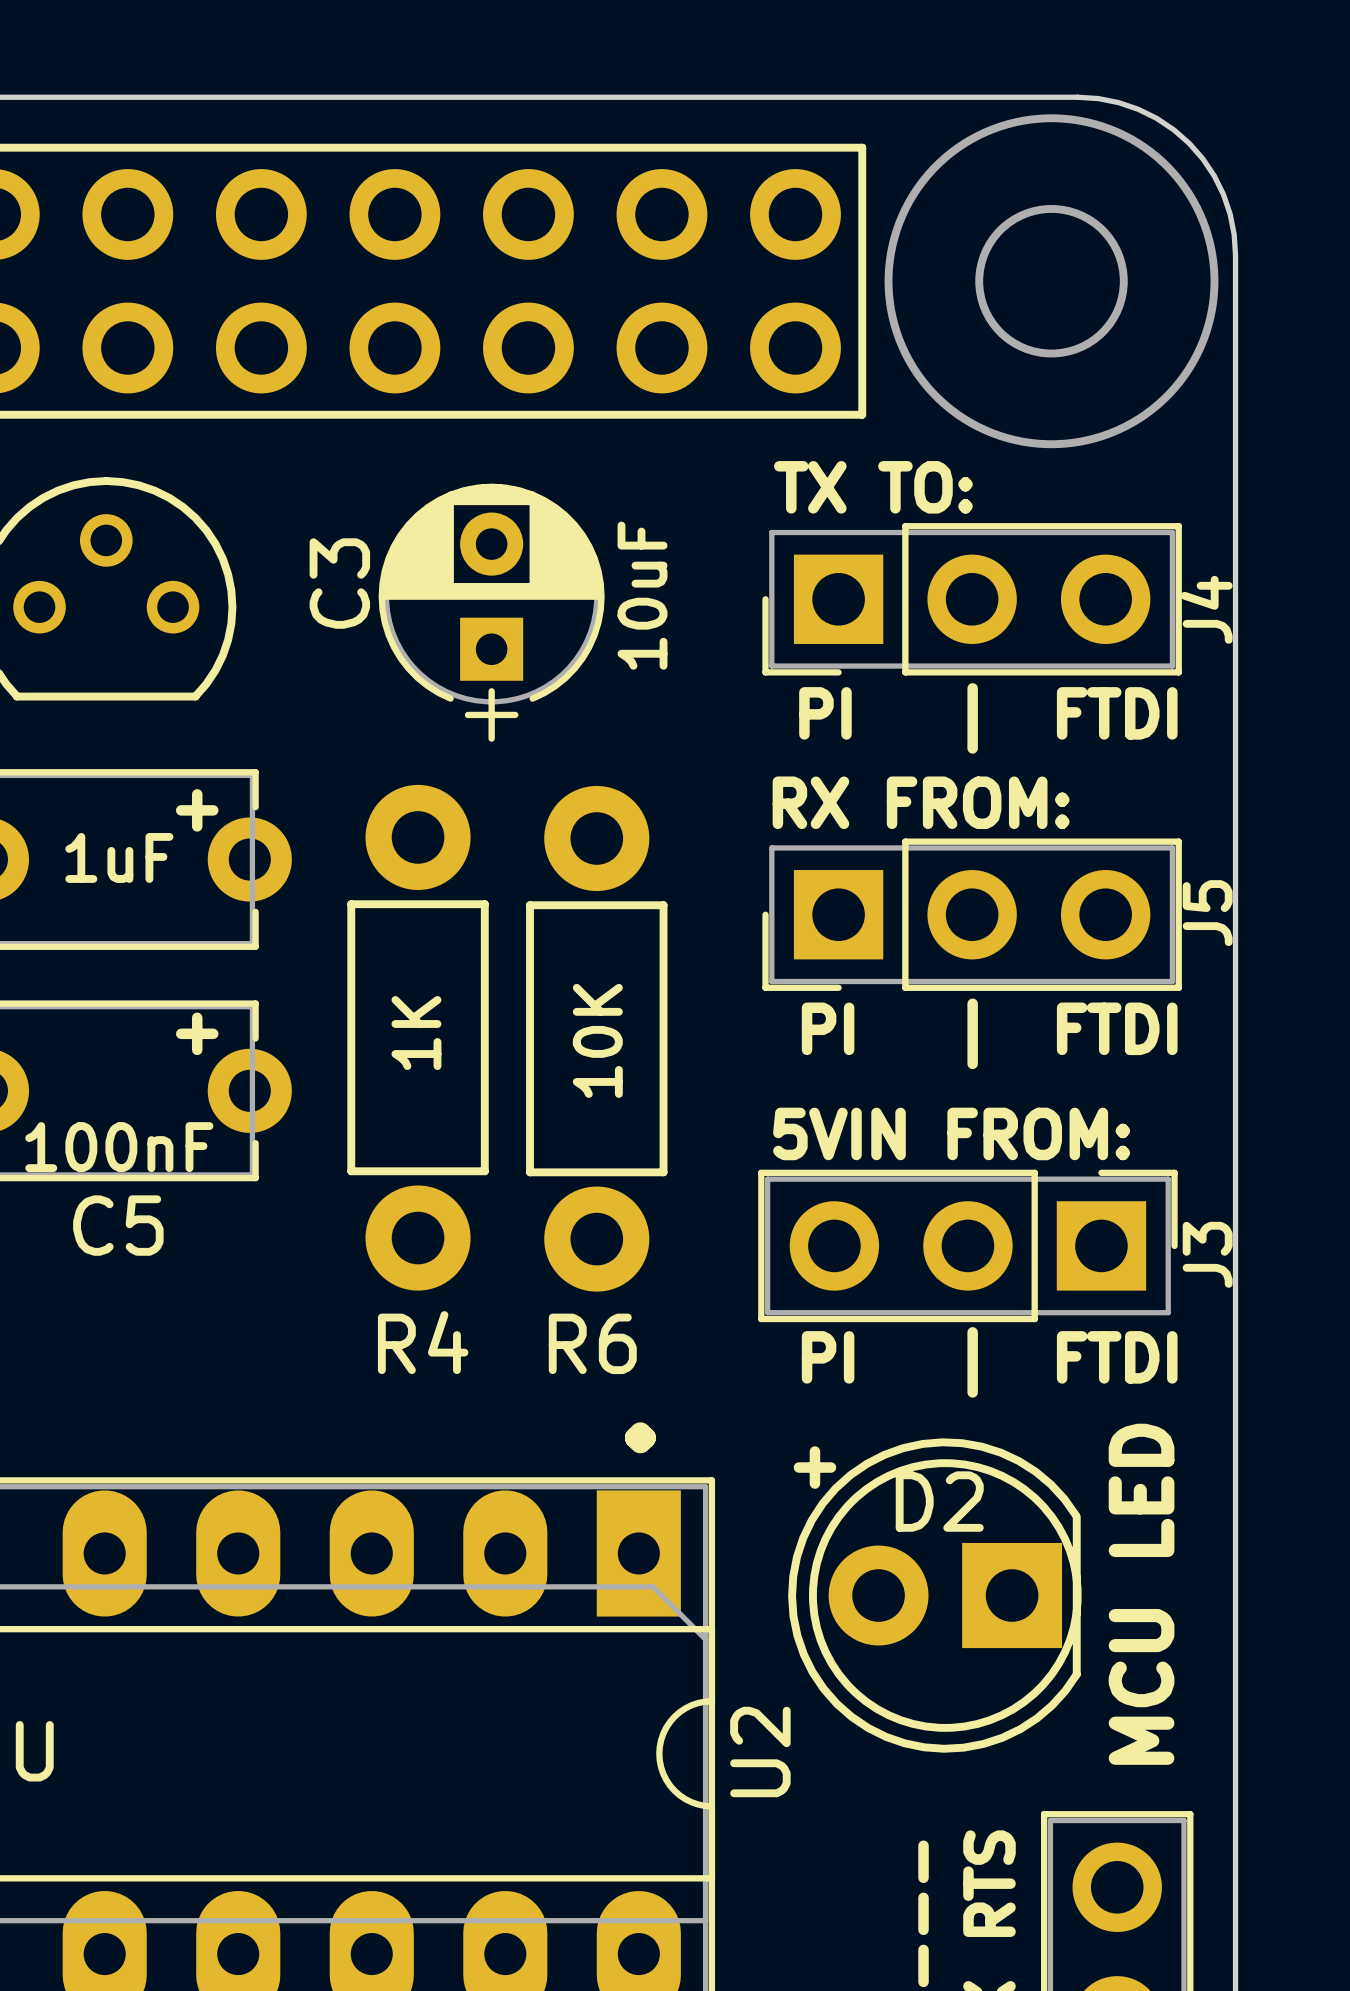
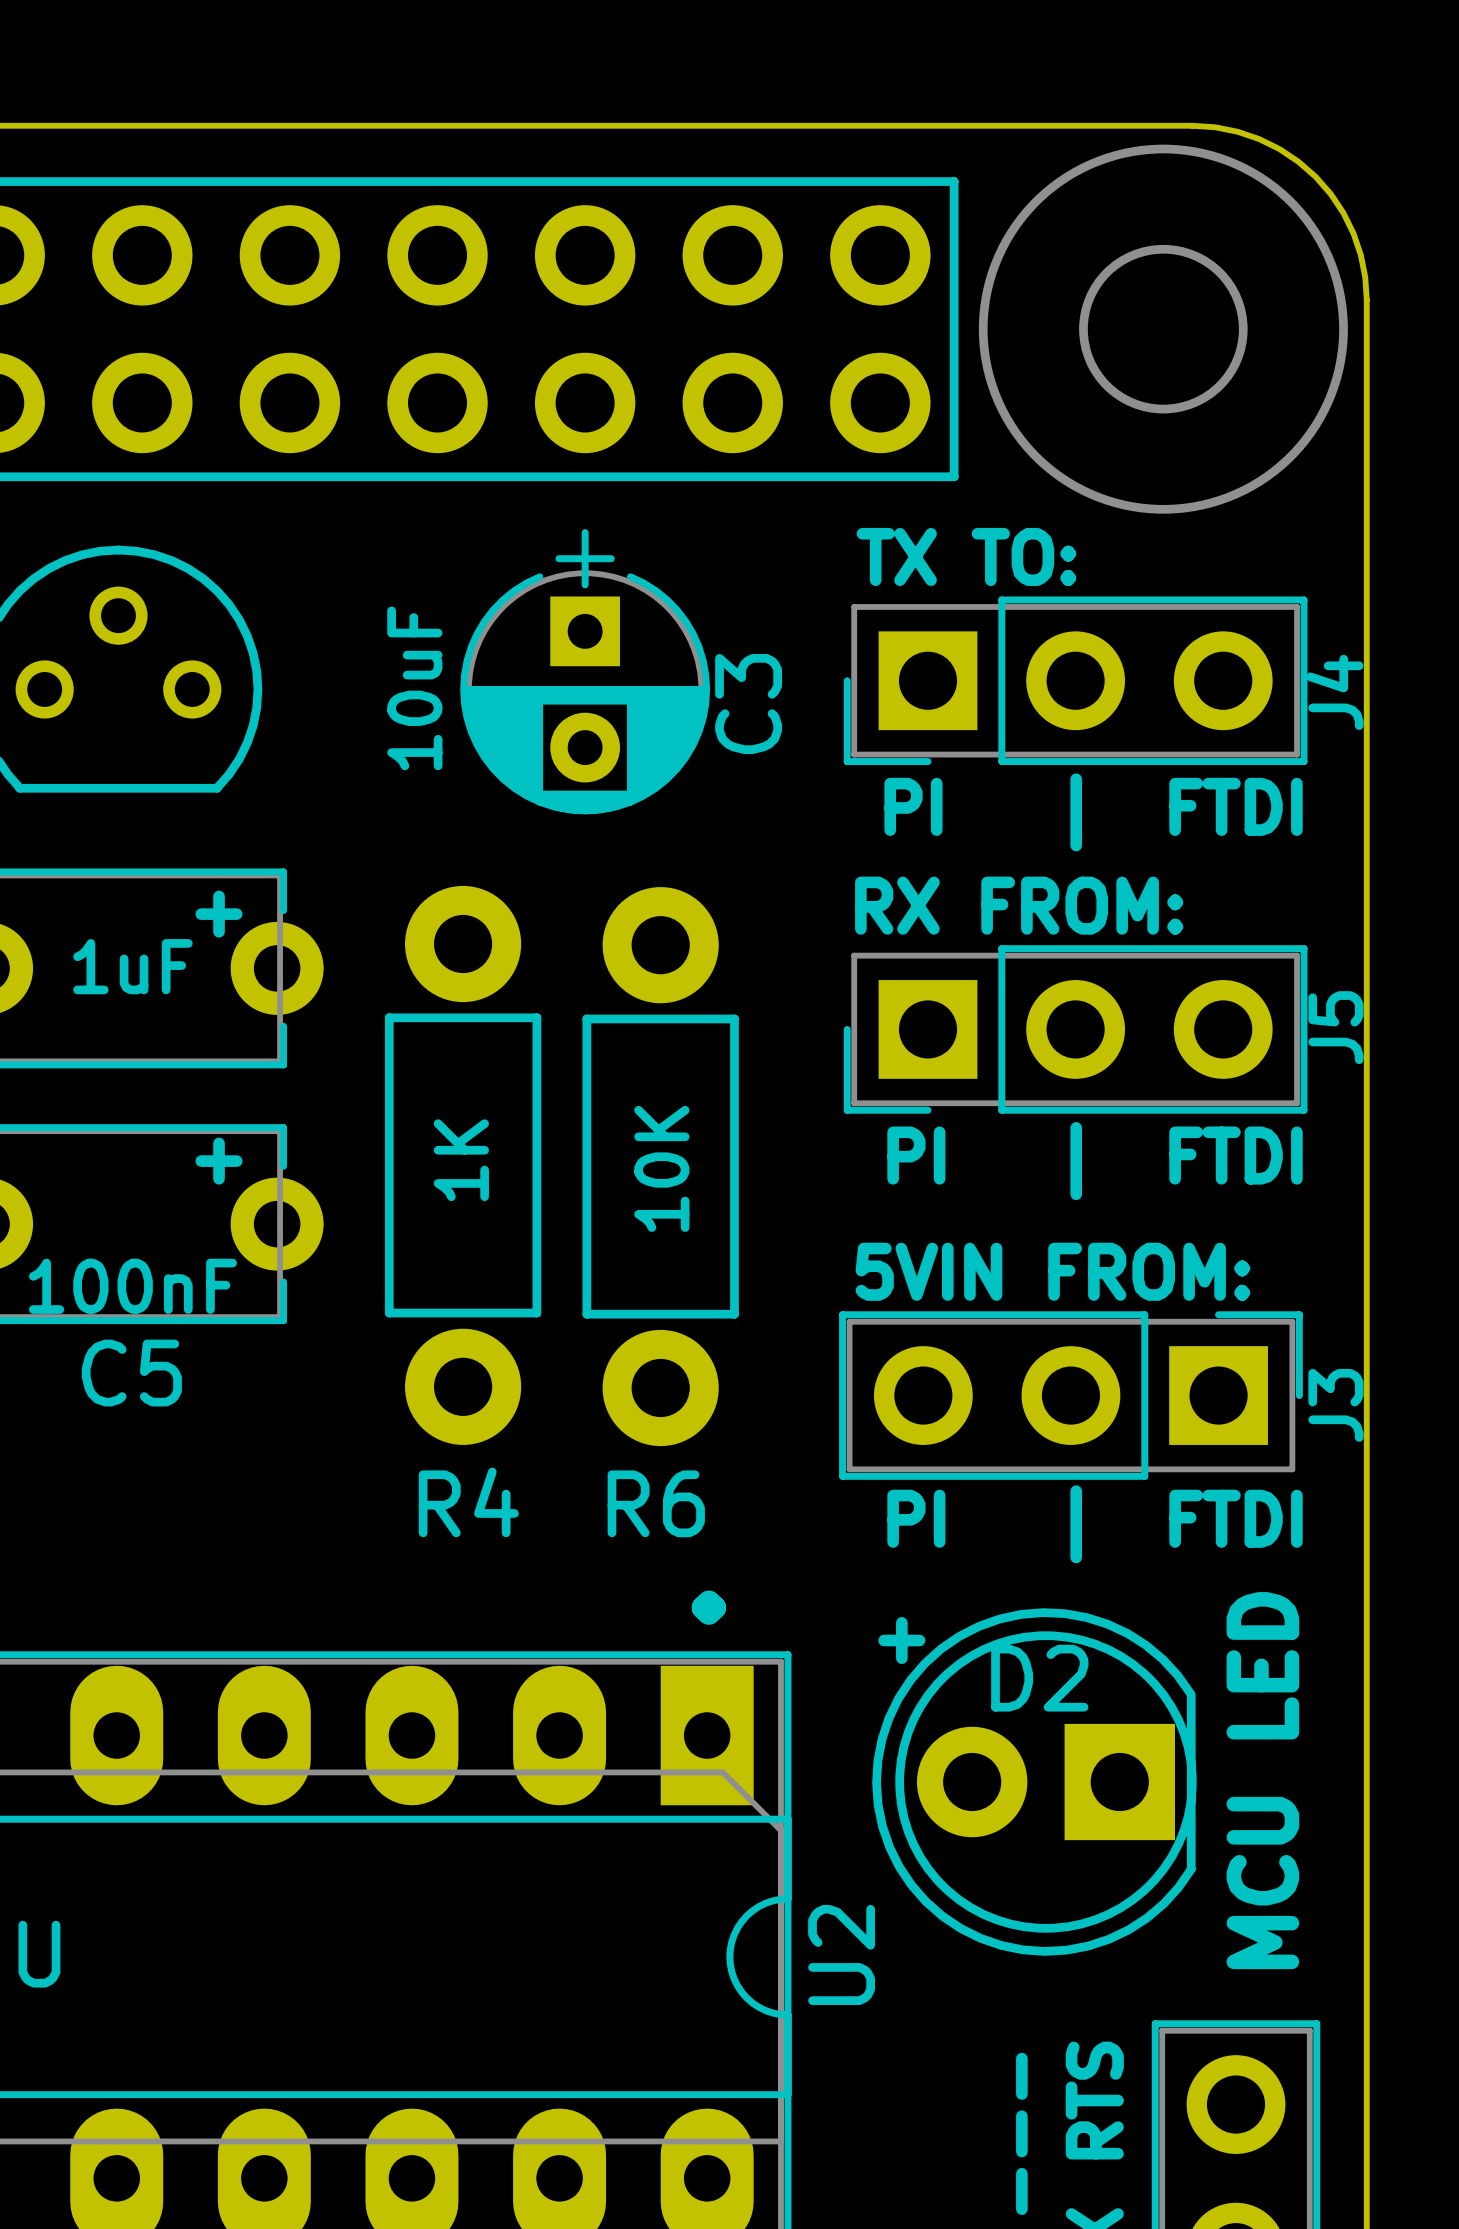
C3 rotation: 0° (491, 612) -> 180° (585, 671)

